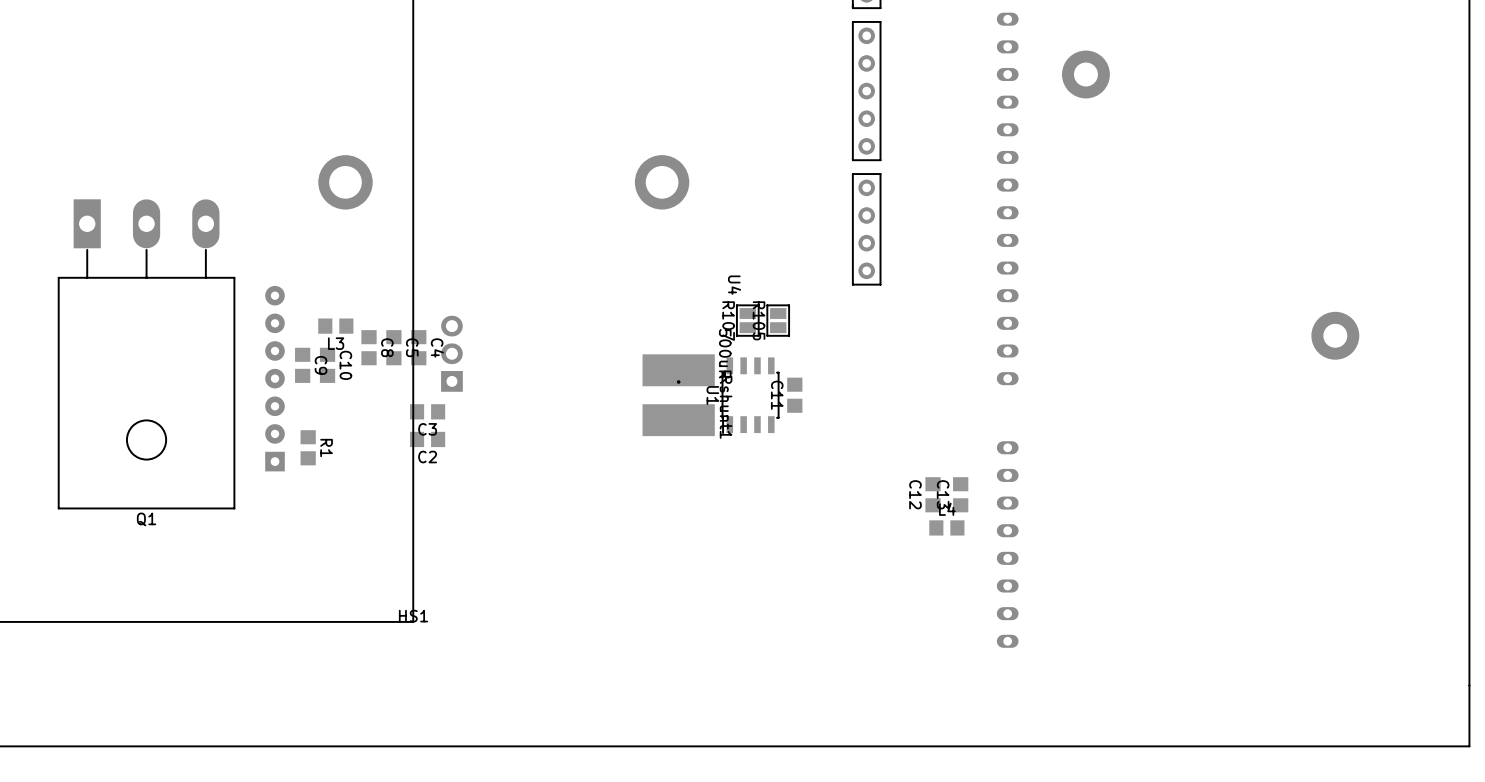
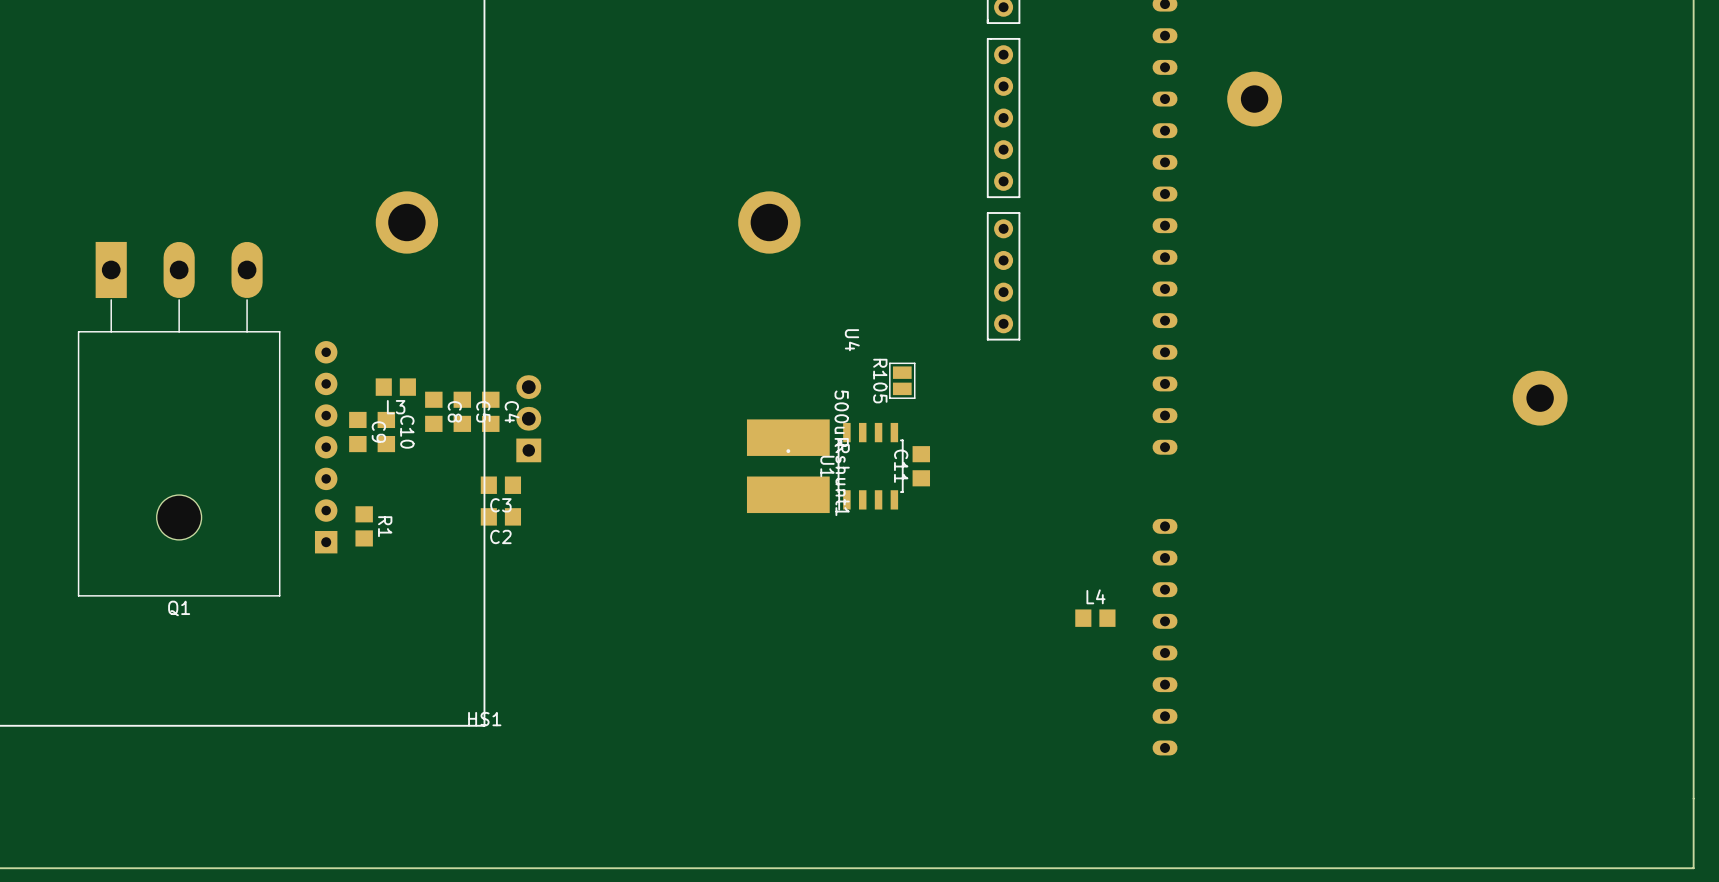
R107: (747, 320) -> none
C12: (933, 494) -> none
C13: (960, 494) -> none

